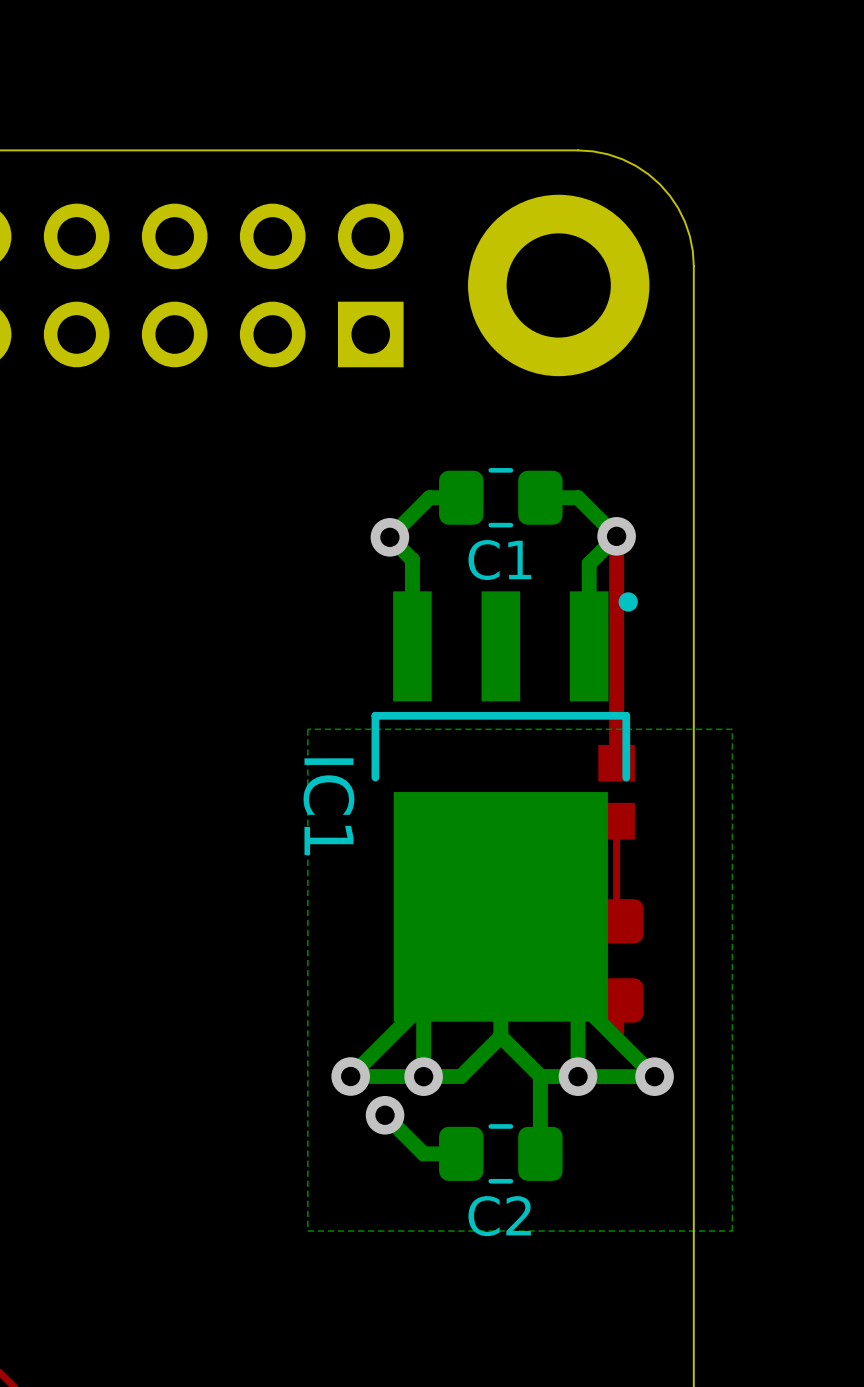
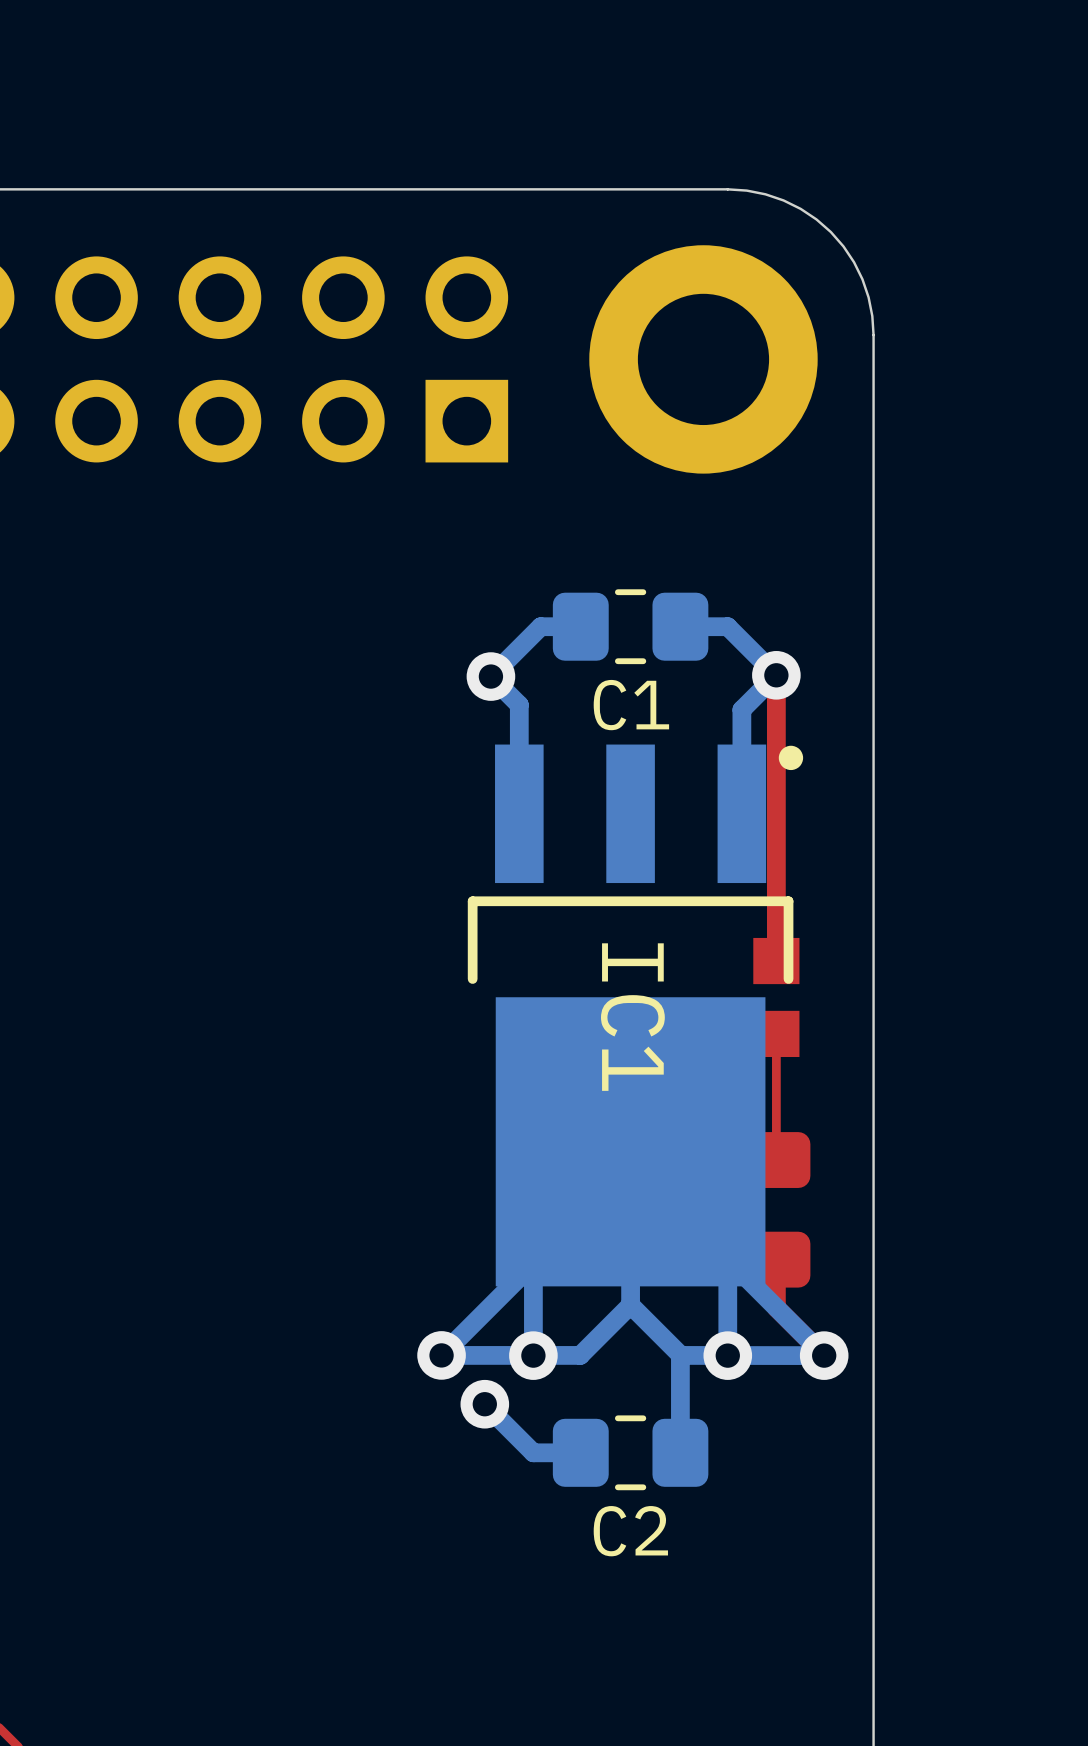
bottom zone outline: (732, 729) (732, 1231) (307, 1231) (307, 729) (732, 729) -> none
IC1 name position: IC1 (328, 806) -> IC1 (632, 1017)

